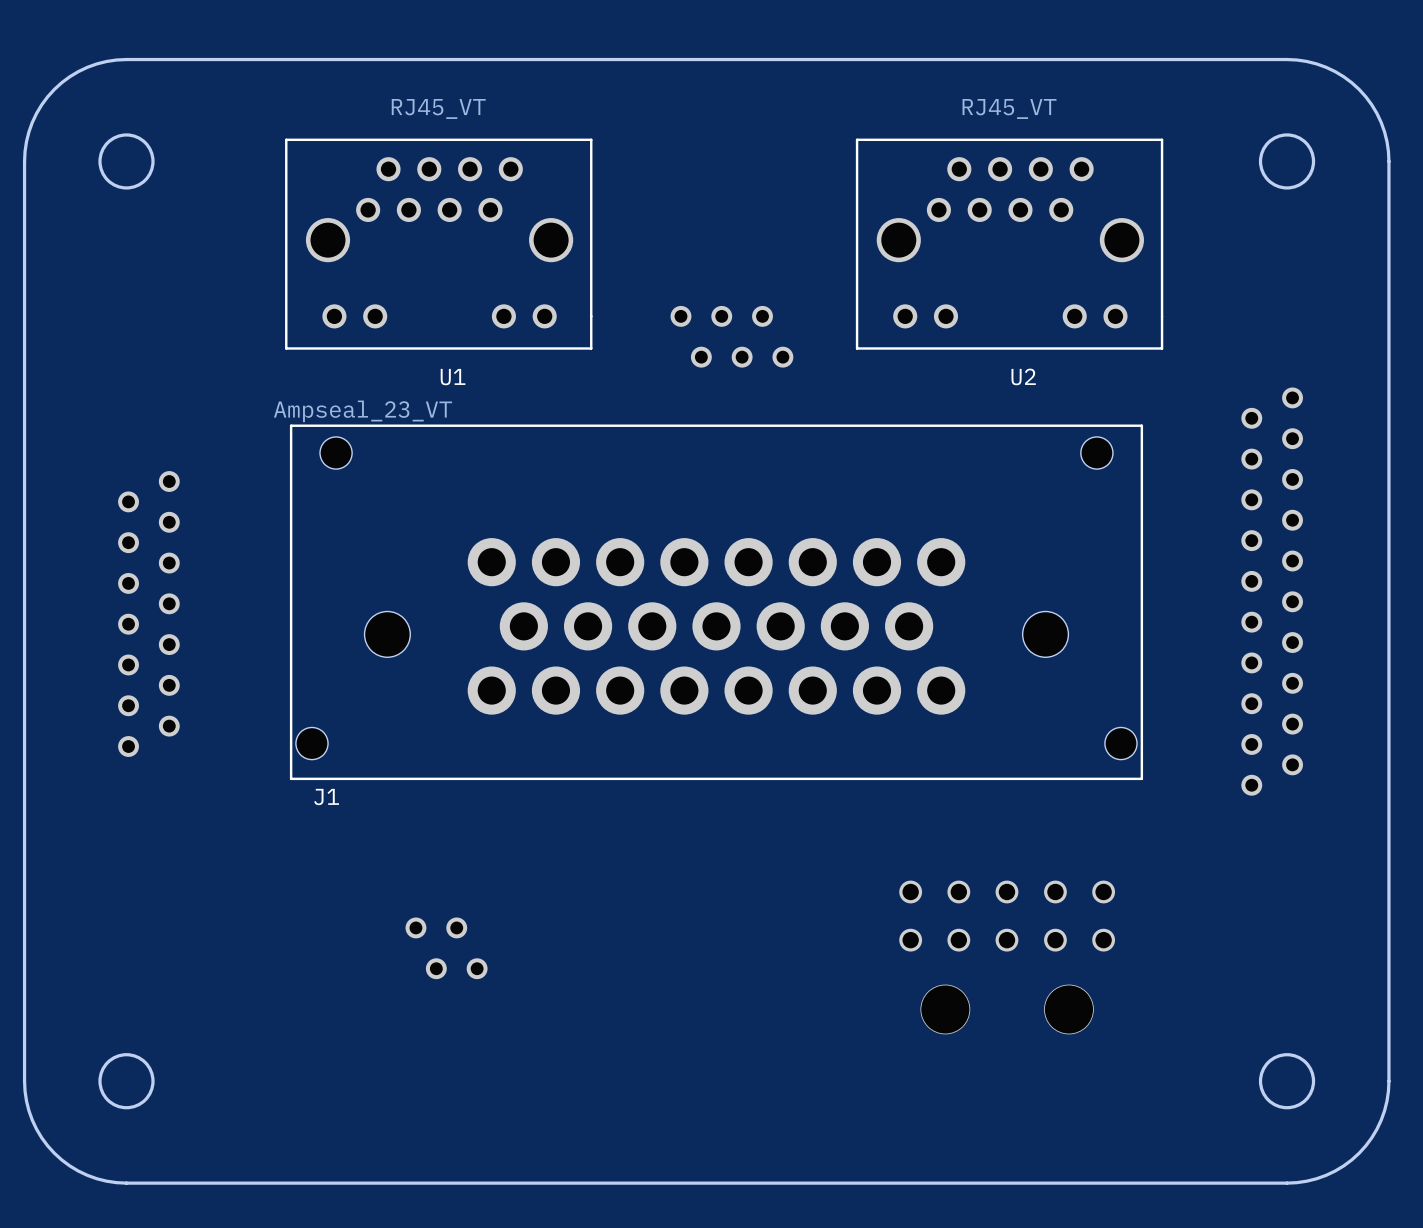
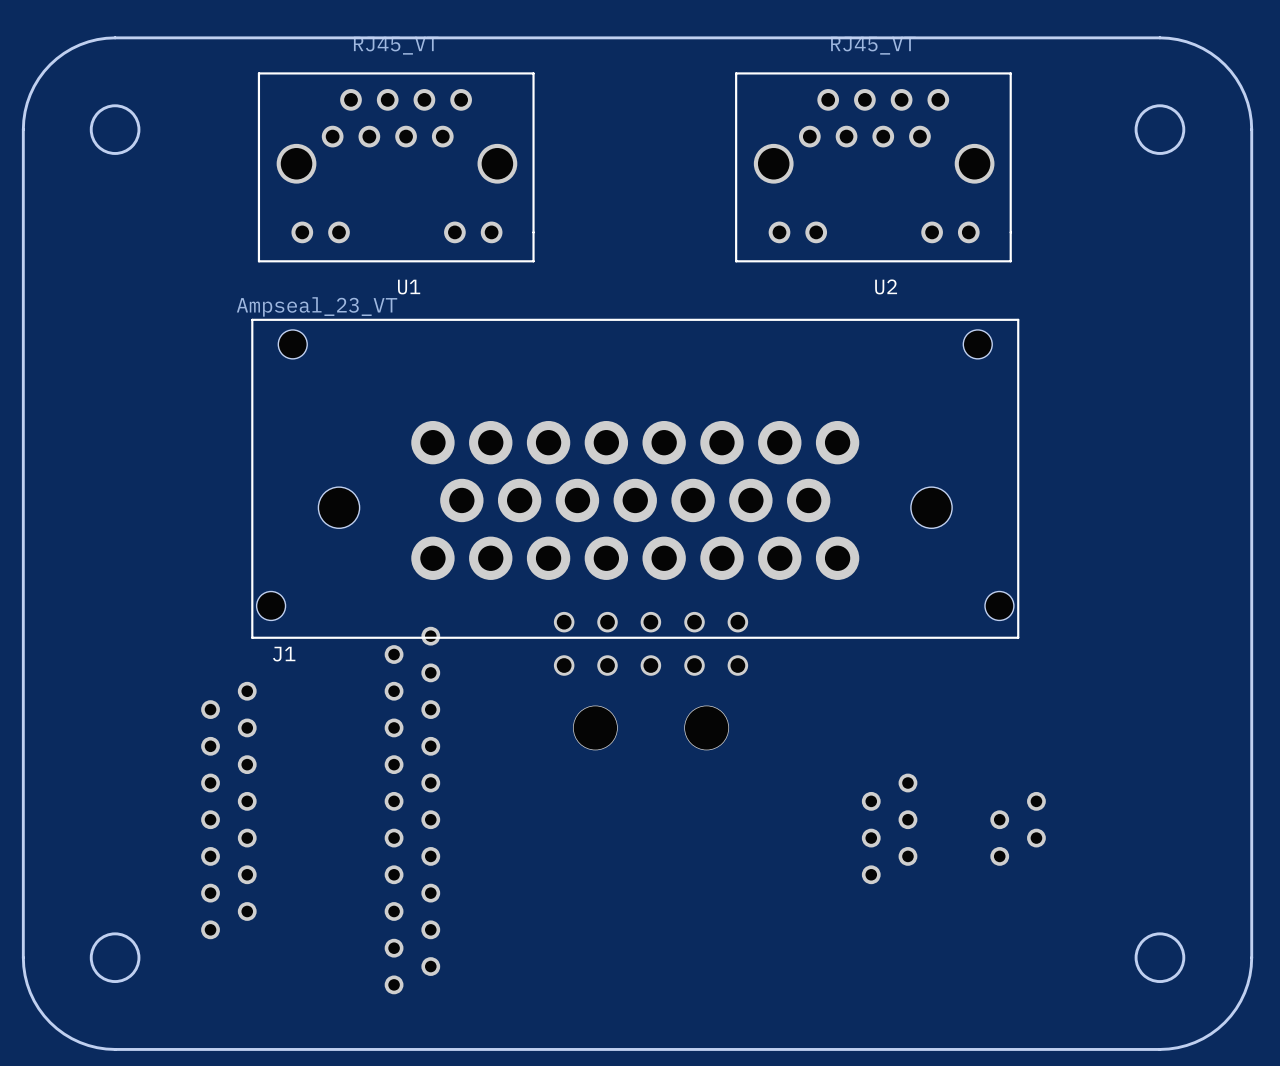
U1 position: (438, 244) -> (396, 167)
U2 position: (1009, 244) -> (873, 167)
part: (731, 336) -> none
part: (1272, 591) -> none
J1 position: (716, 602) -> (635, 478)
part position: (148, 614) -> (228, 810)
part: none -> (412, 810)
part: none -> (889, 828)
part: none -> (1018, 828)
part: (446, 948) -> none
part position: (1007, 957) -> (651, 681)

